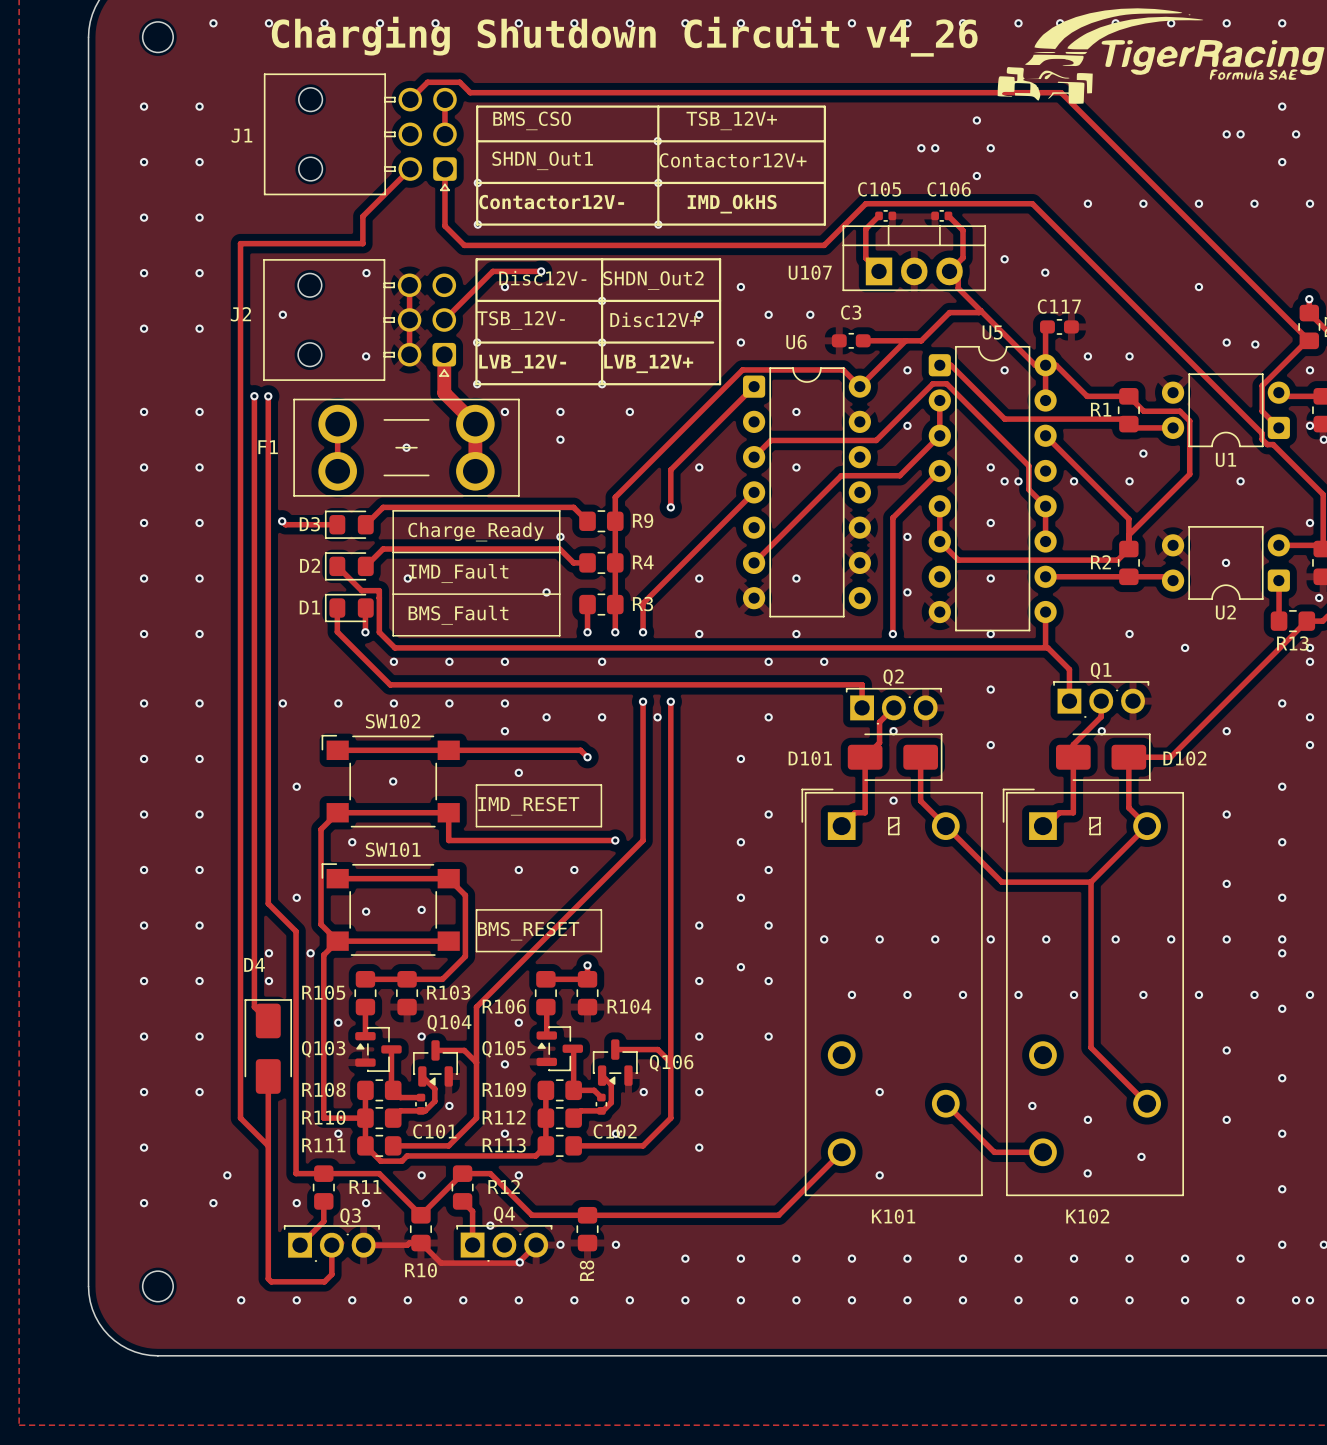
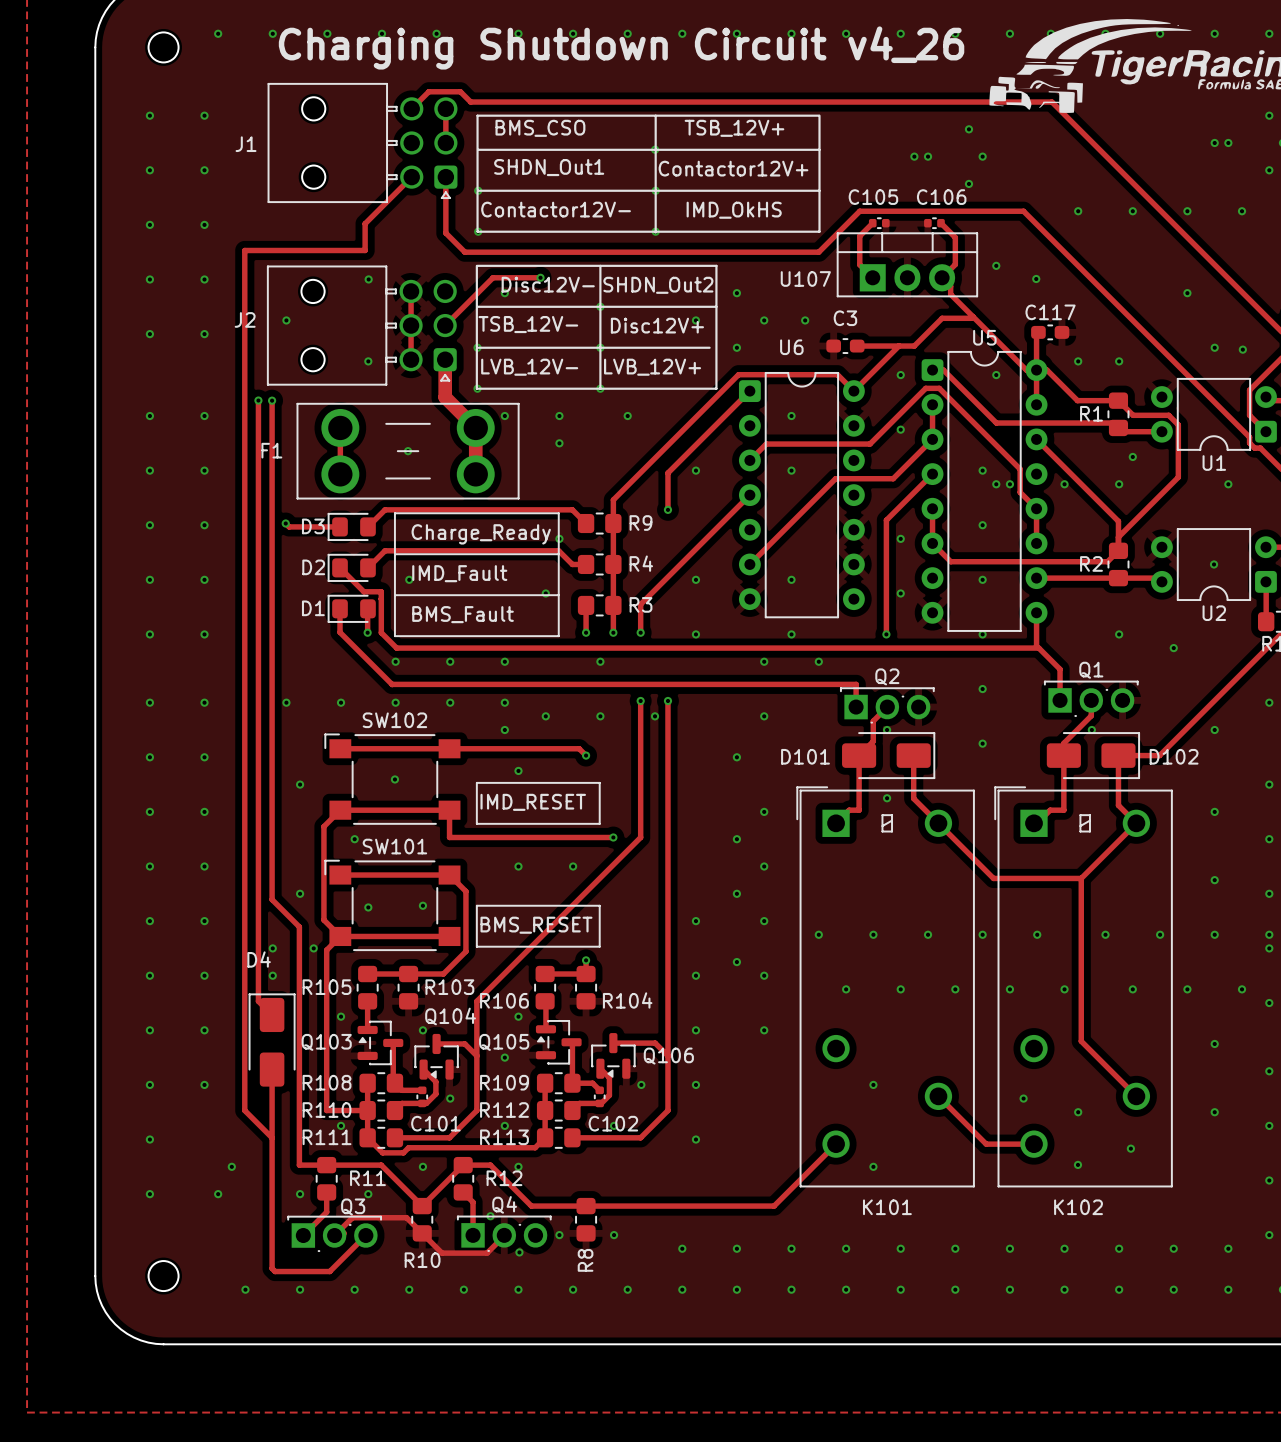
track: (420, 1243) (409, 1243) (407, 1245) (363, 1245) -> (422, 1233) (406, 1217) (352, 1217) (334, 1235)
track: (331, 1245) (331, 1274) (324, 1281) -> (365, 1235) (329, 1271) (327, 1271)
track: (536, 1245) (518, 1263) (486, 1263) -> (504, 1235) (487, 1253)

